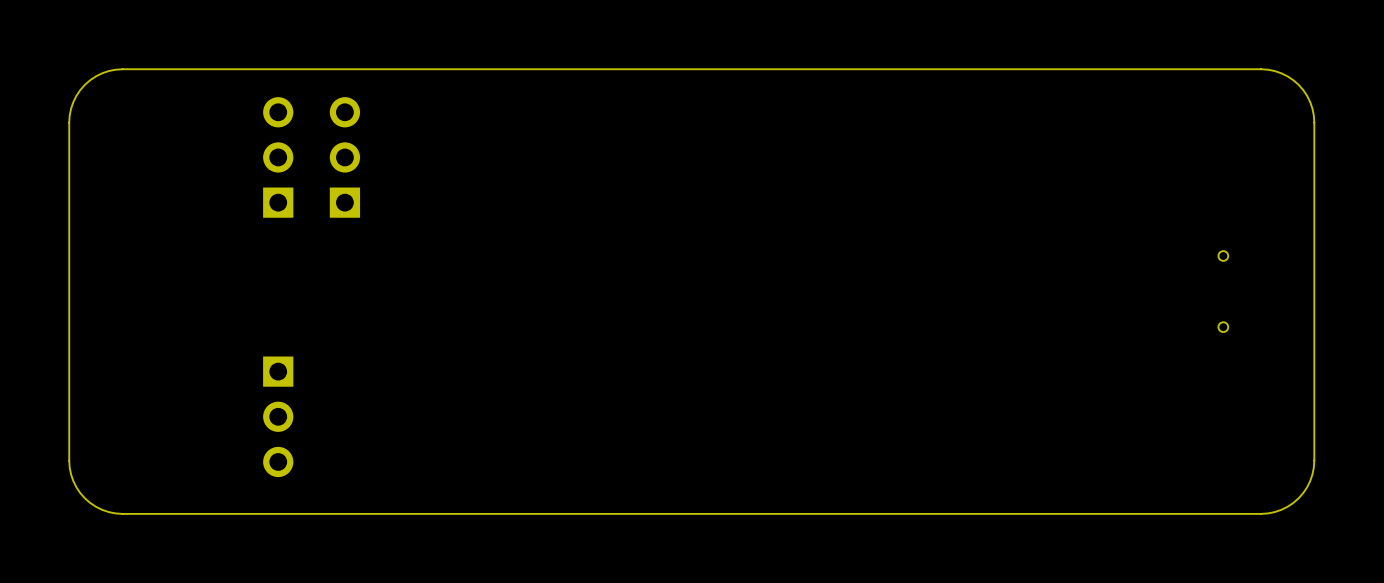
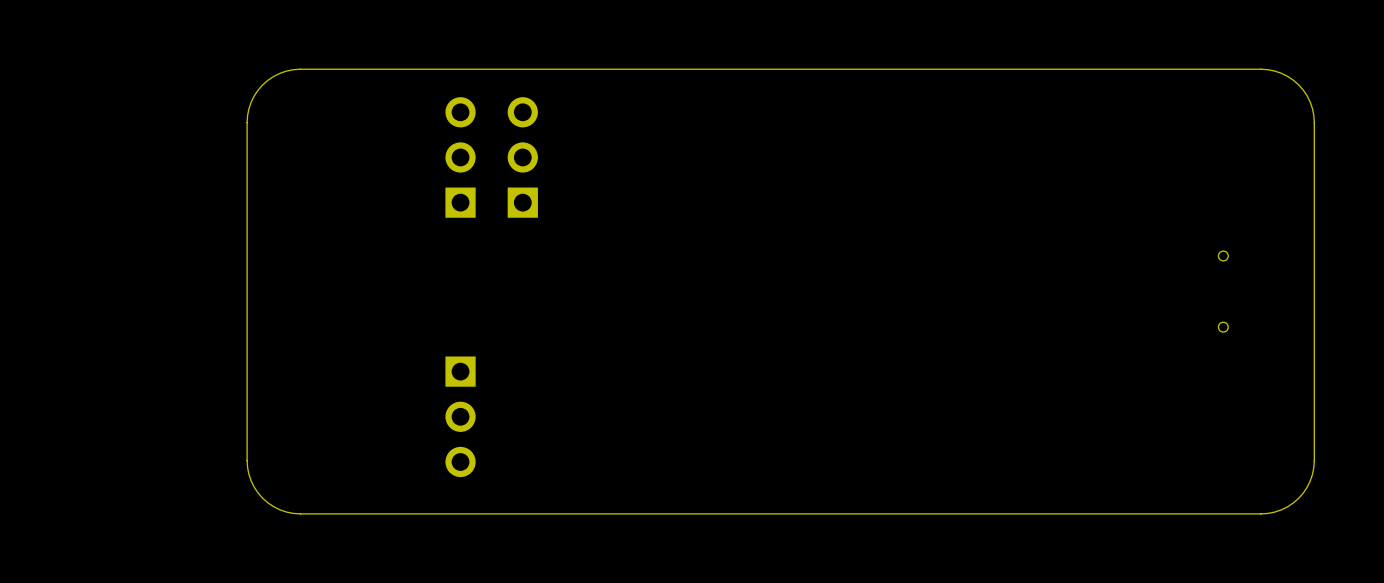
board edge: (300, 69) (122, 69) (108, 71) (95, 76) (80, 90) (73, 102) (69, 122) (69, 460) (71, 474) (76, 487) (84, 498) (95, 506) (115, 513) (300, 513) -> (300, 69) (280, 73) (262, 84) (251, 102) (247, 122) (247, 467) (254, 487) (267, 502) (280, 509) (300, 513)
part: (278, 157) -> none
part: (344, 157) -> none
part: none -> (460, 157)
part: none -> (522, 157)
part: (278, 416) -> none
part: none -> (460, 416)

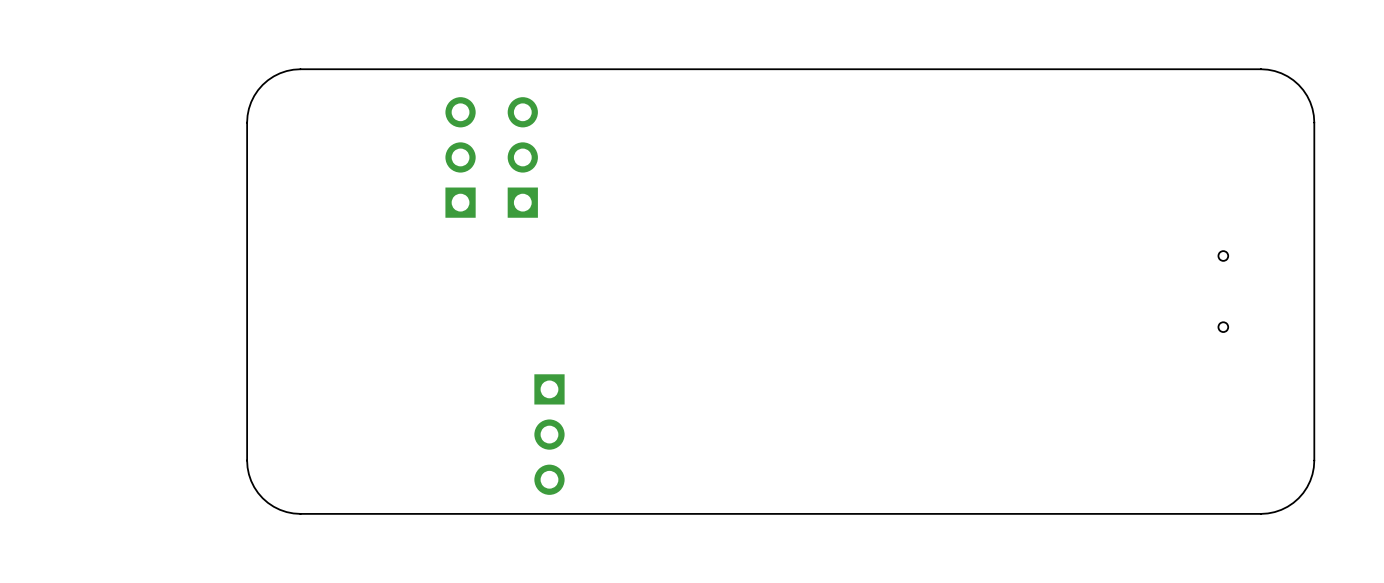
part position: (460, 416) -> (549, 434)

